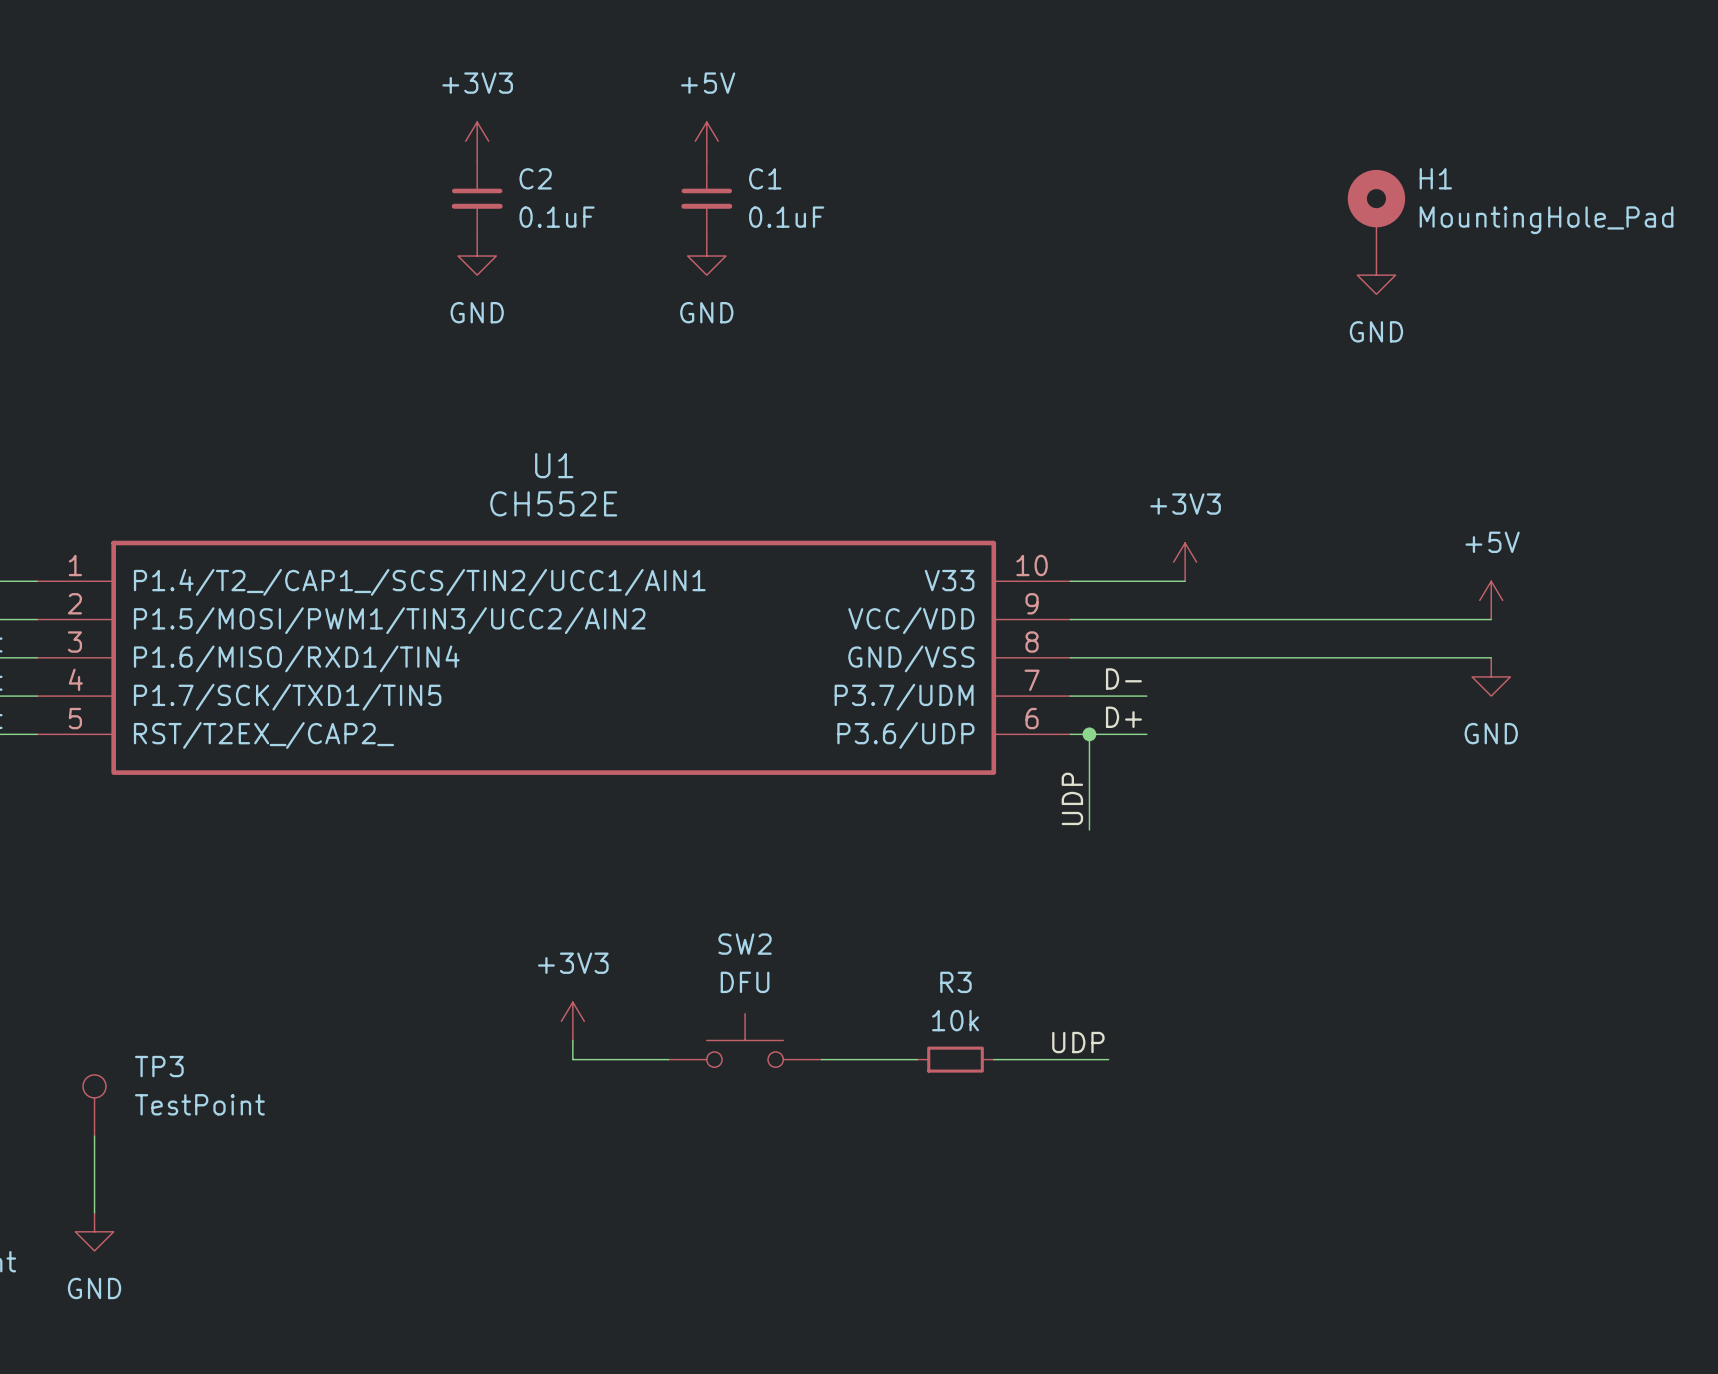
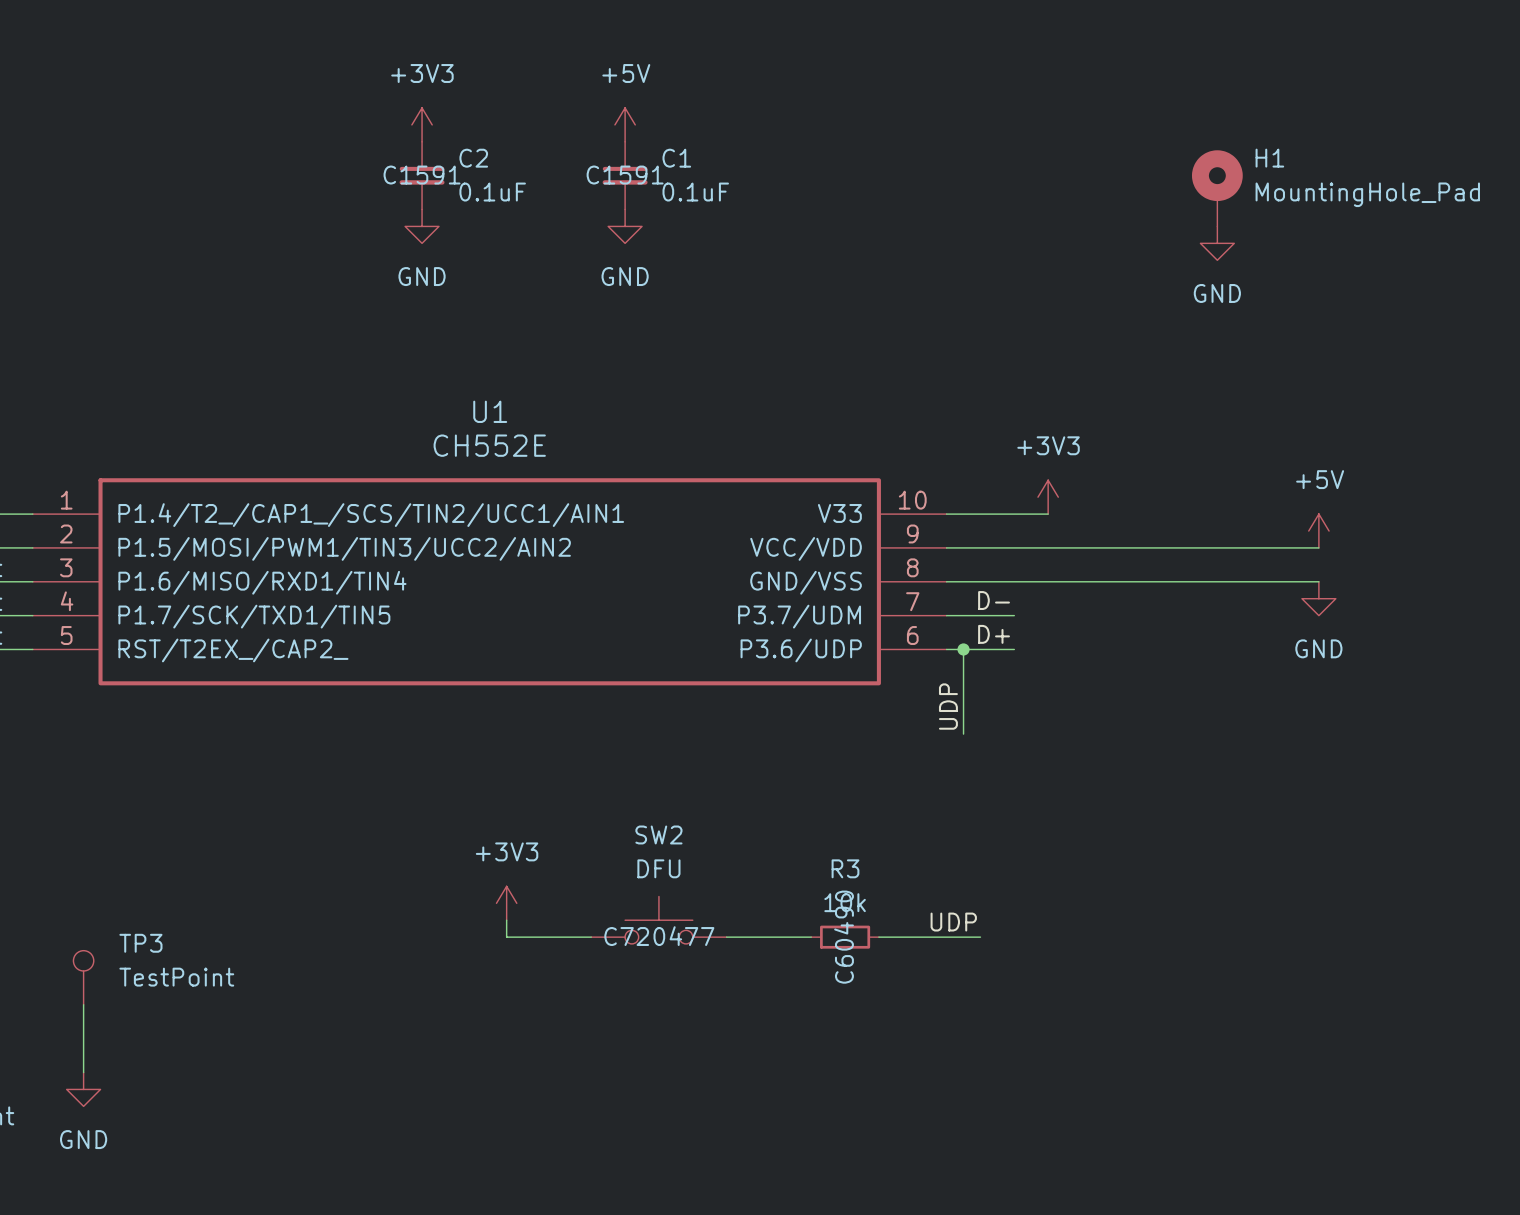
C2 text: none -> C1591 (422, 175)
C1 text: none -> C1591 (625, 175)
SW2 text: none -> C720477 (659, 936)
R3 text: none -> C60490 (844, 937)

